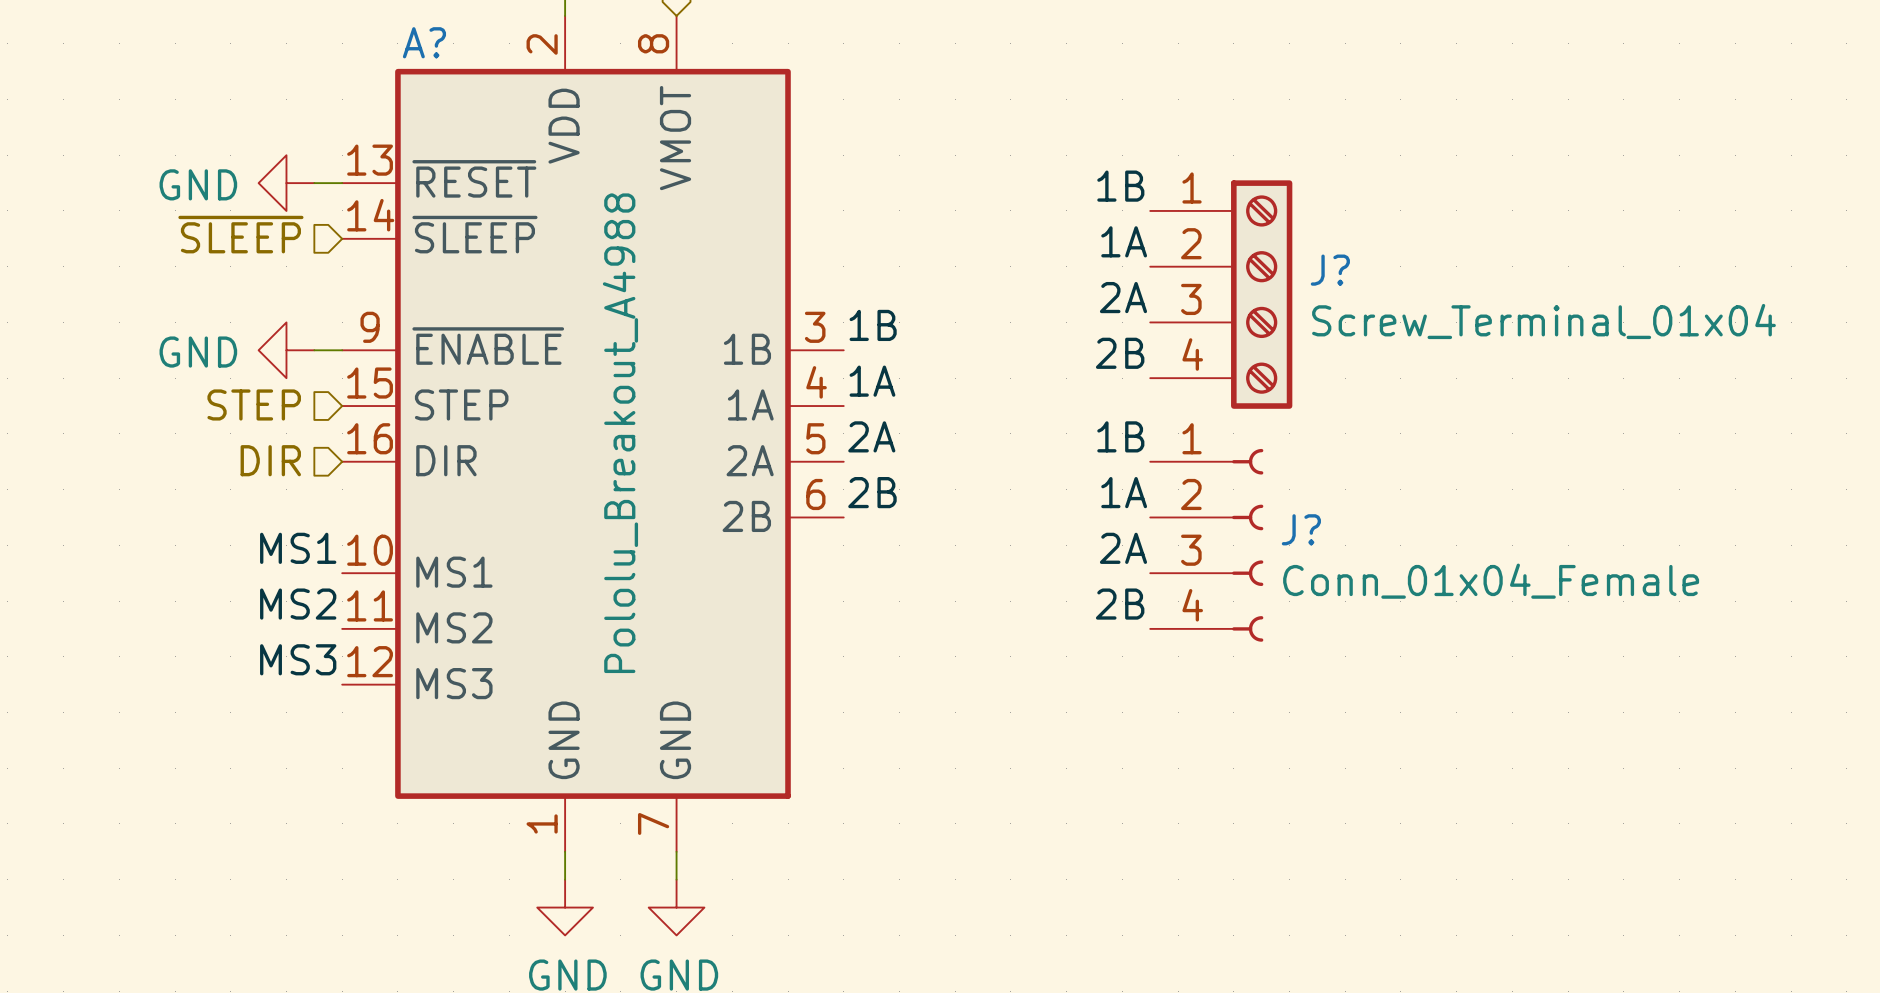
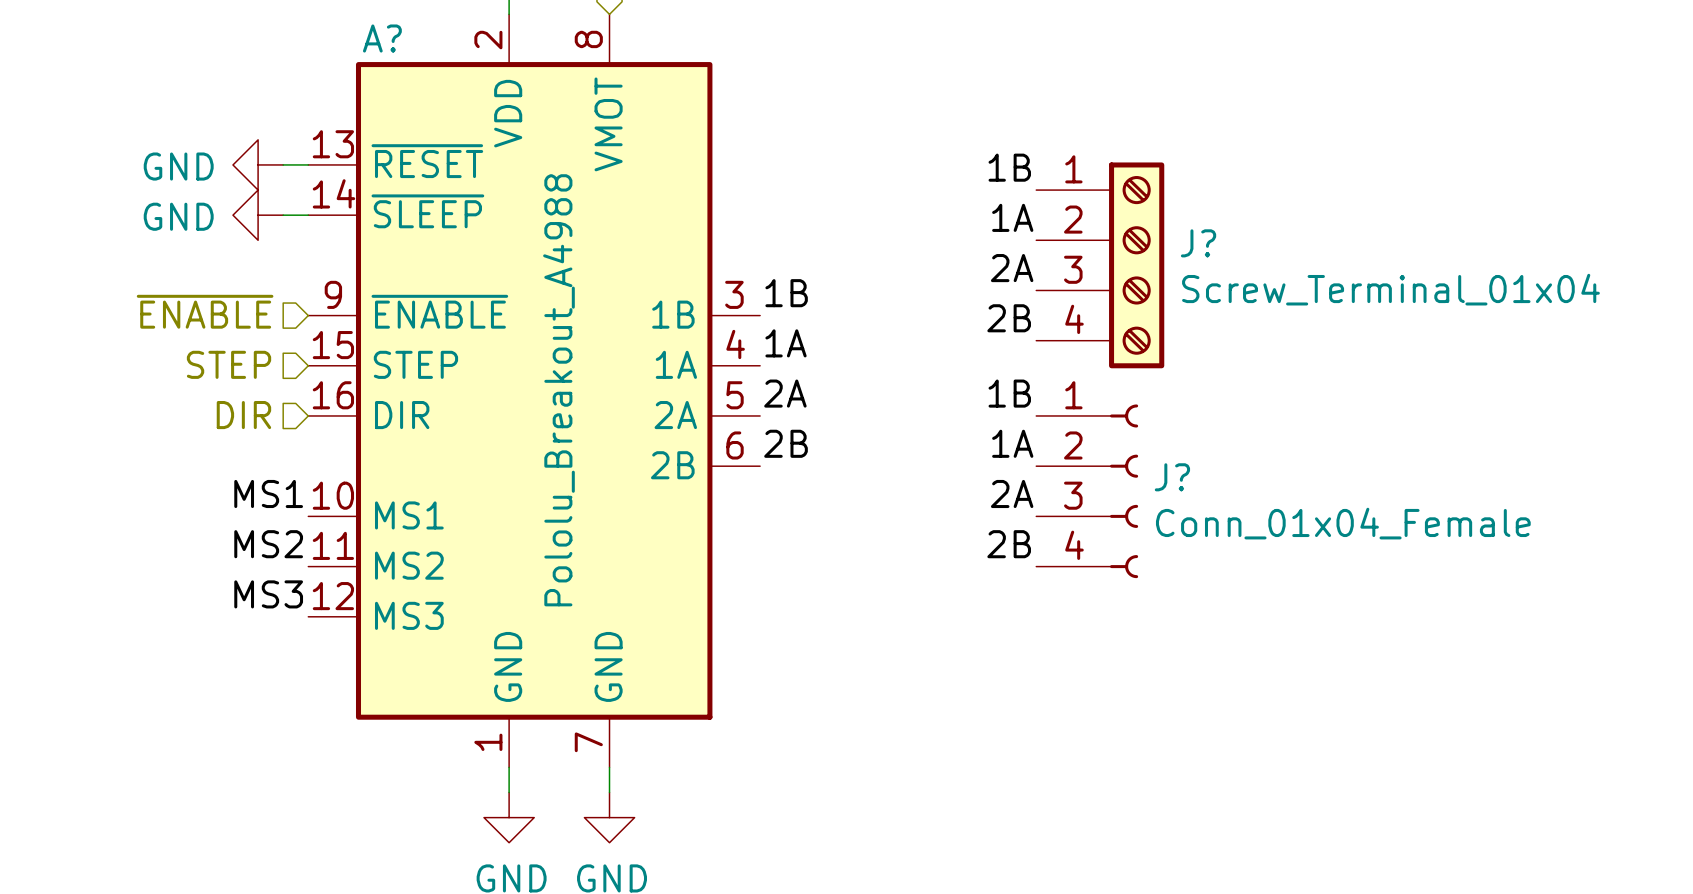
hierarchical label: ~{SLEEP} (240, 234) -> none
hierarchical label: none -> ~{ENABLE} (205, 311)
power symbol position: GND (286, 350) -> GND (258, 215)
wire: (314, 350) (342, 350) -> (283, 215) (308, 215)

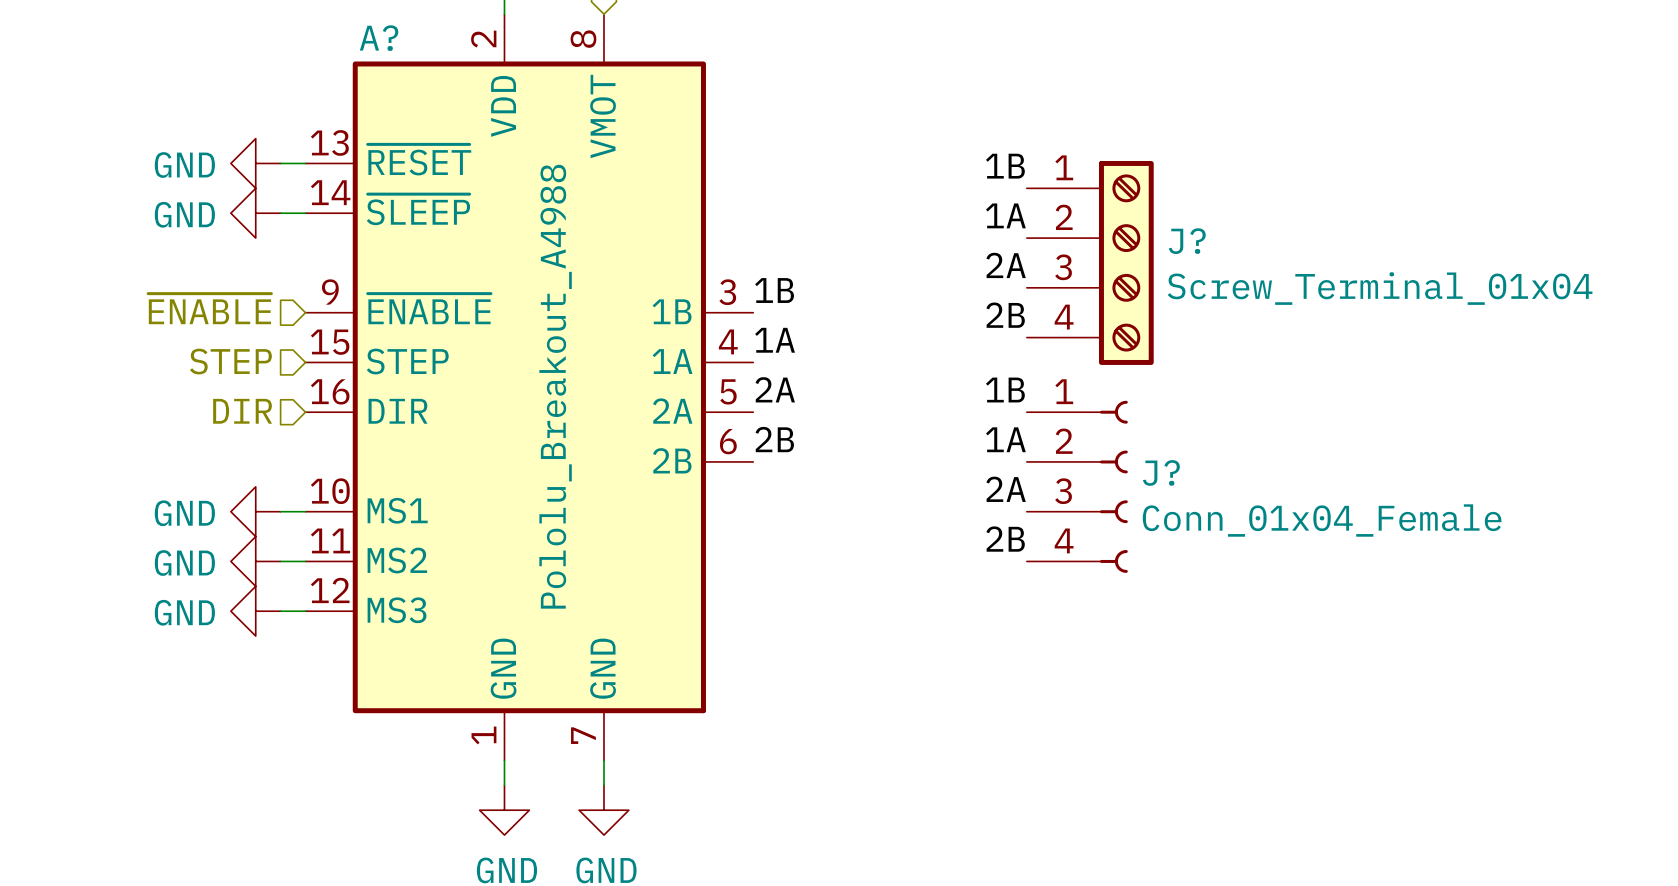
label: MS1 (268, 493) -> none
power symbol: none -> GND (255, 511)
wire: none -> (280, 511) (305, 511)
label: MS2 (268, 544) -> none
power symbol: none -> GND (255, 561)
wire: none -> (280, 561) (305, 561)
label: MS3 (268, 594) -> none
power symbol: none -> GND (255, 611)
wire: none -> (280, 611) (305, 611)

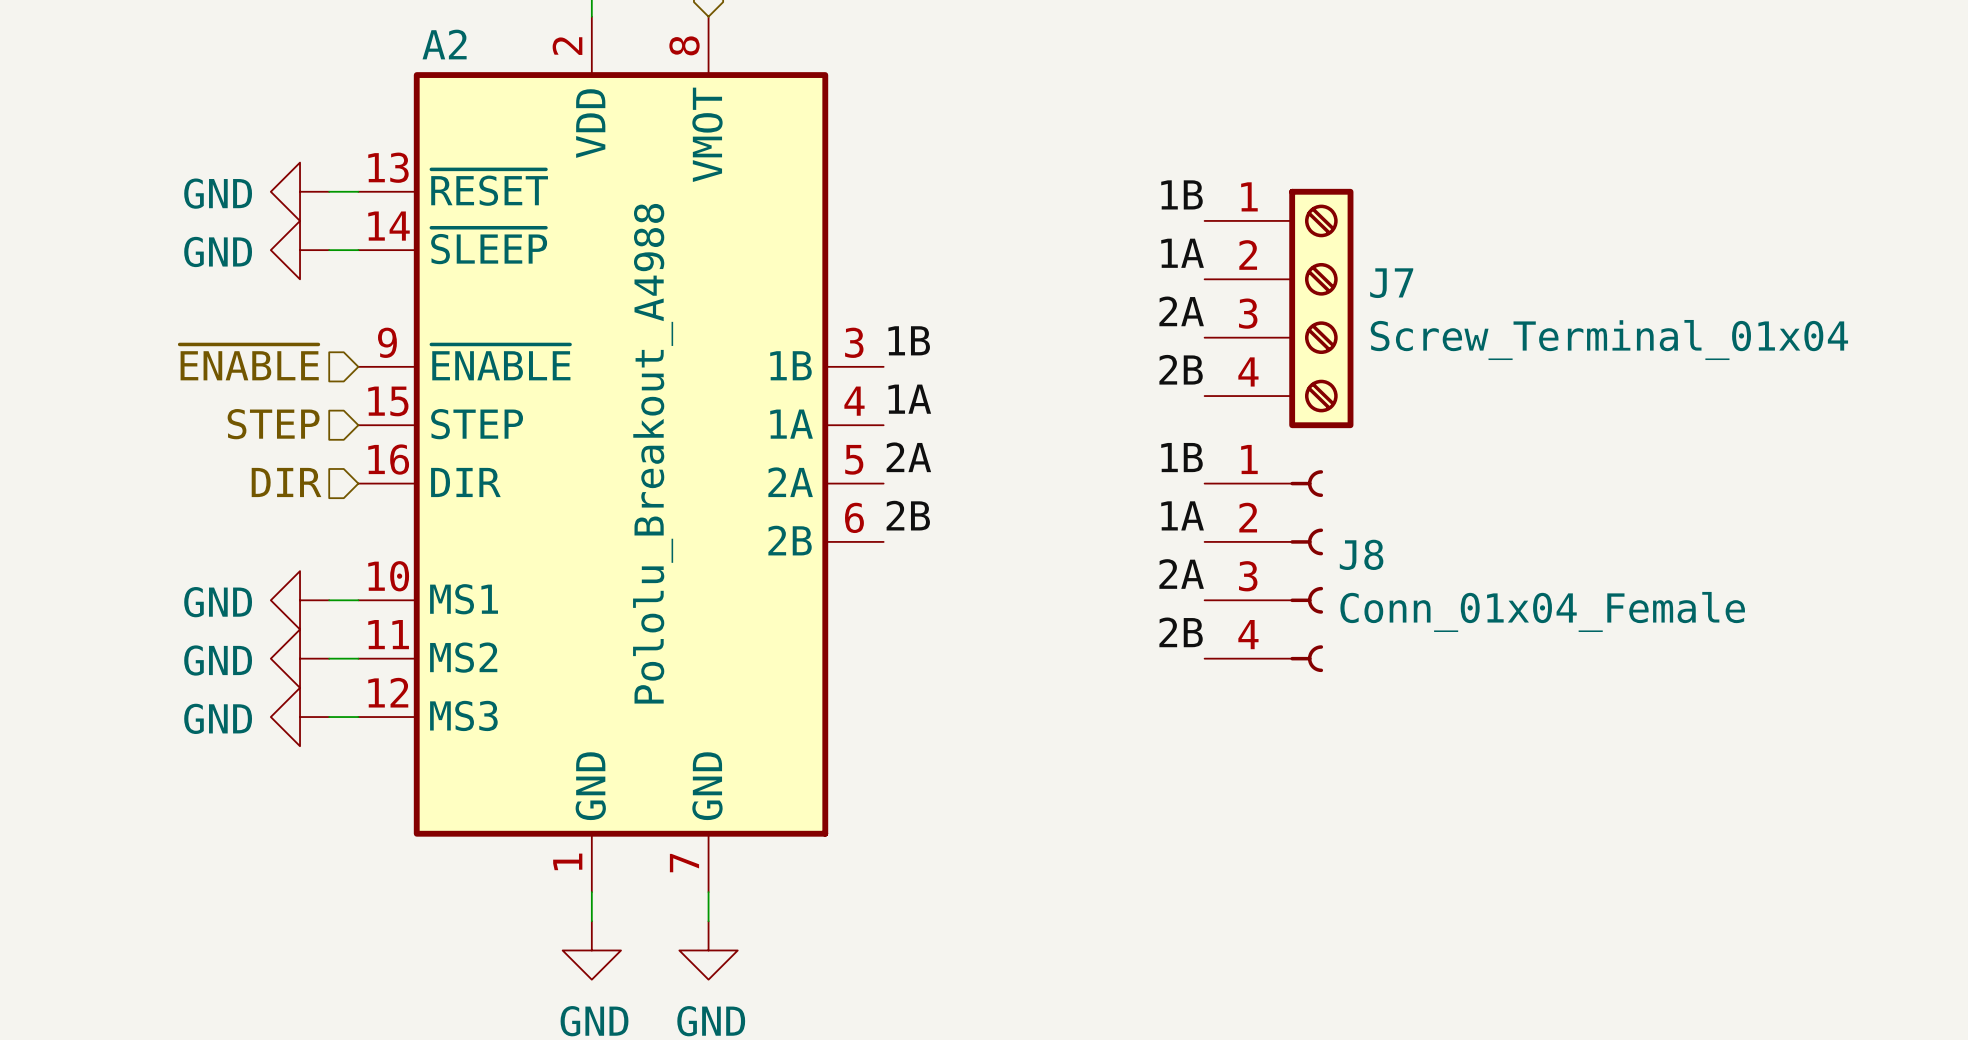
A? name: A? (379, 38) -> A2 (444, 44)
J? name: J? (1187, 241) -> J7 (1391, 283)
J? name: J? (1161, 472) -> J8 (1361, 554)

